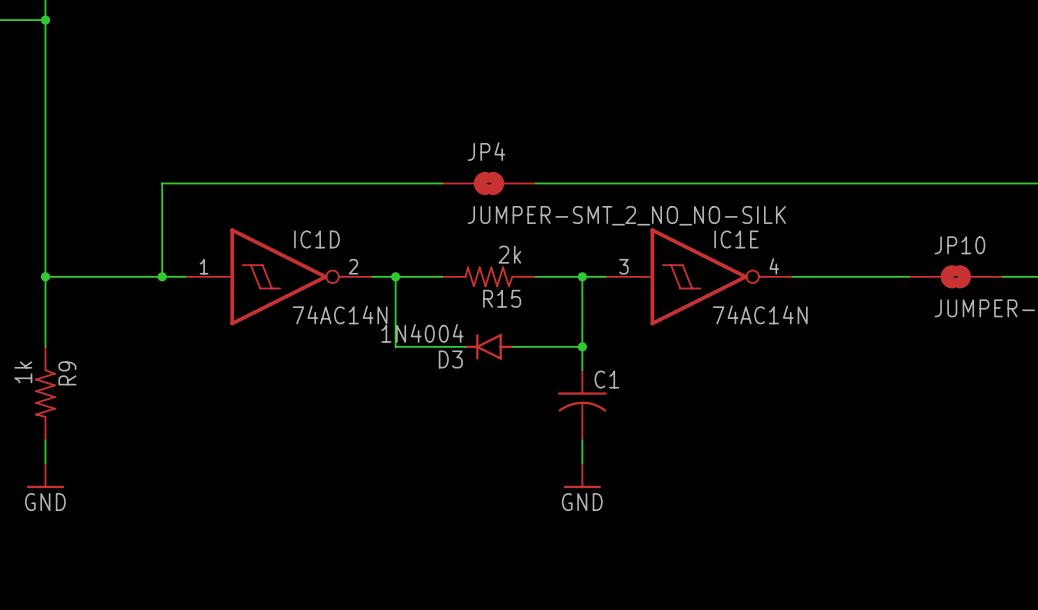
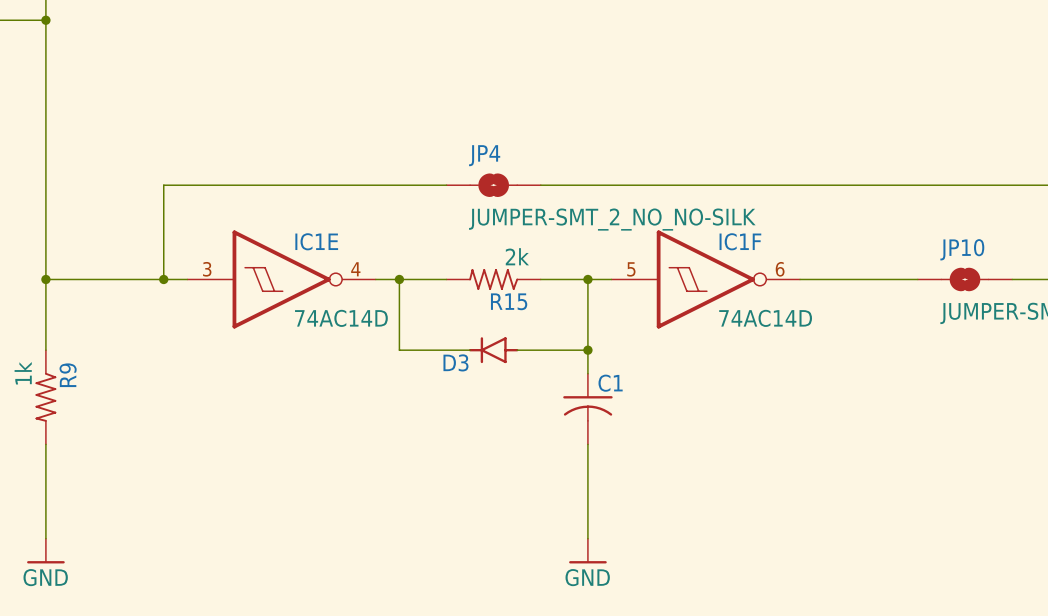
IC1D: 74AC14N (278, 276) -> none
IC1E position: (699, 276) -> (281, 279)
IC1F: none -> 74AC14D (705, 279)
IC1E value: 74AC14N (760, 314) -> 74AC14D (341, 318)
D3 value: 1N4004 (422, 333) -> none
wire: none -> (45, 468) (45, 538)
wire: none -> (587, 468) (587, 538)
power symbol position: GND (45, 475) -> GND (45, 551)
power symbol position: GND (582, 475) -> GND (587, 551)

